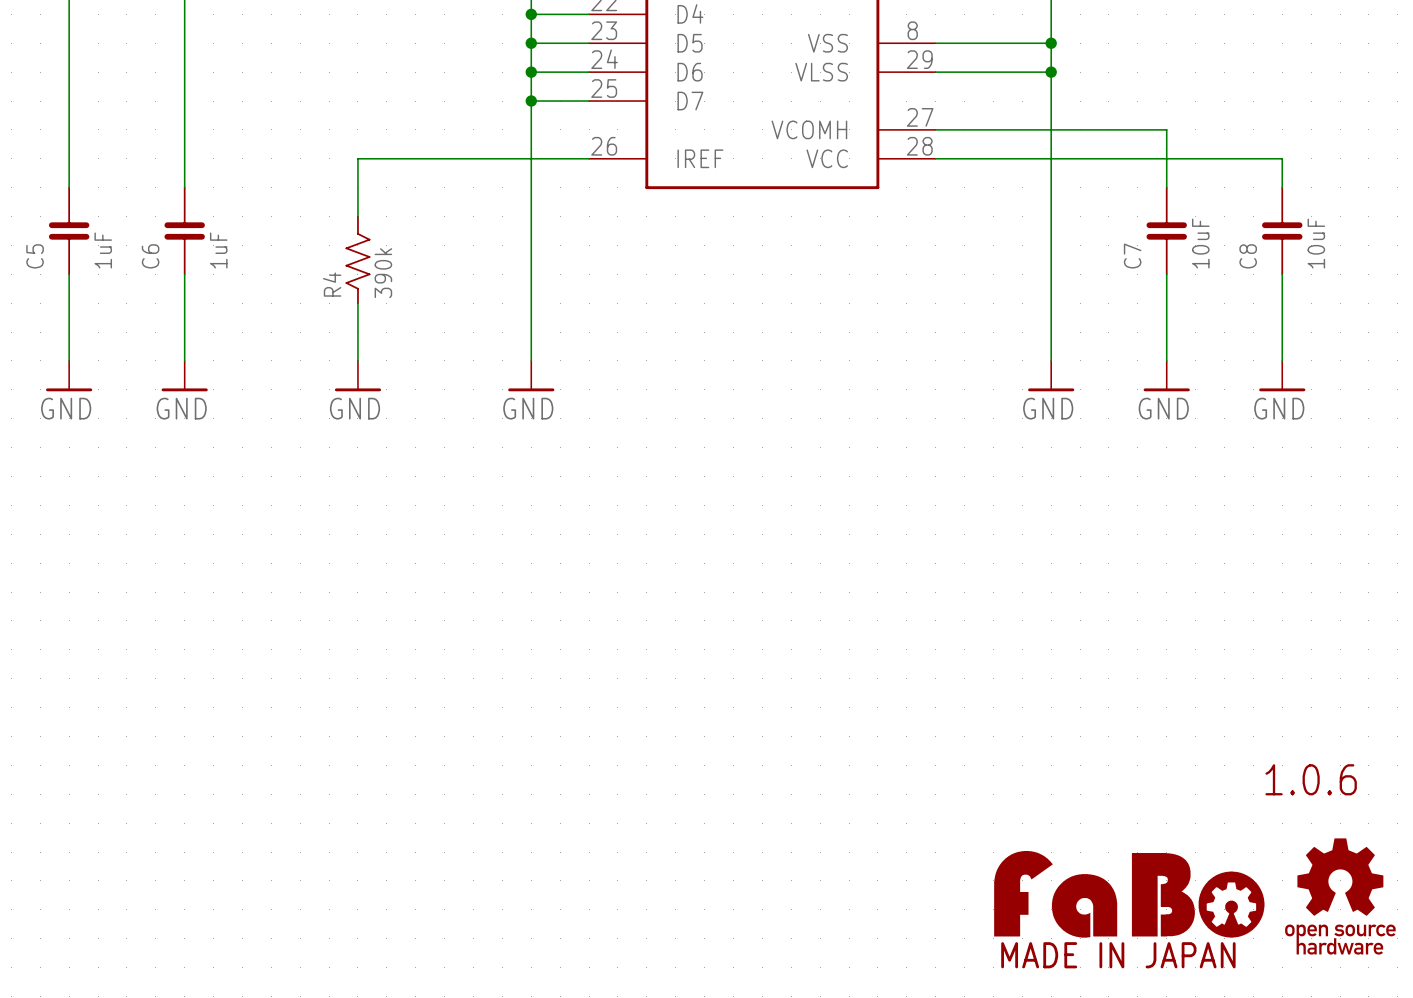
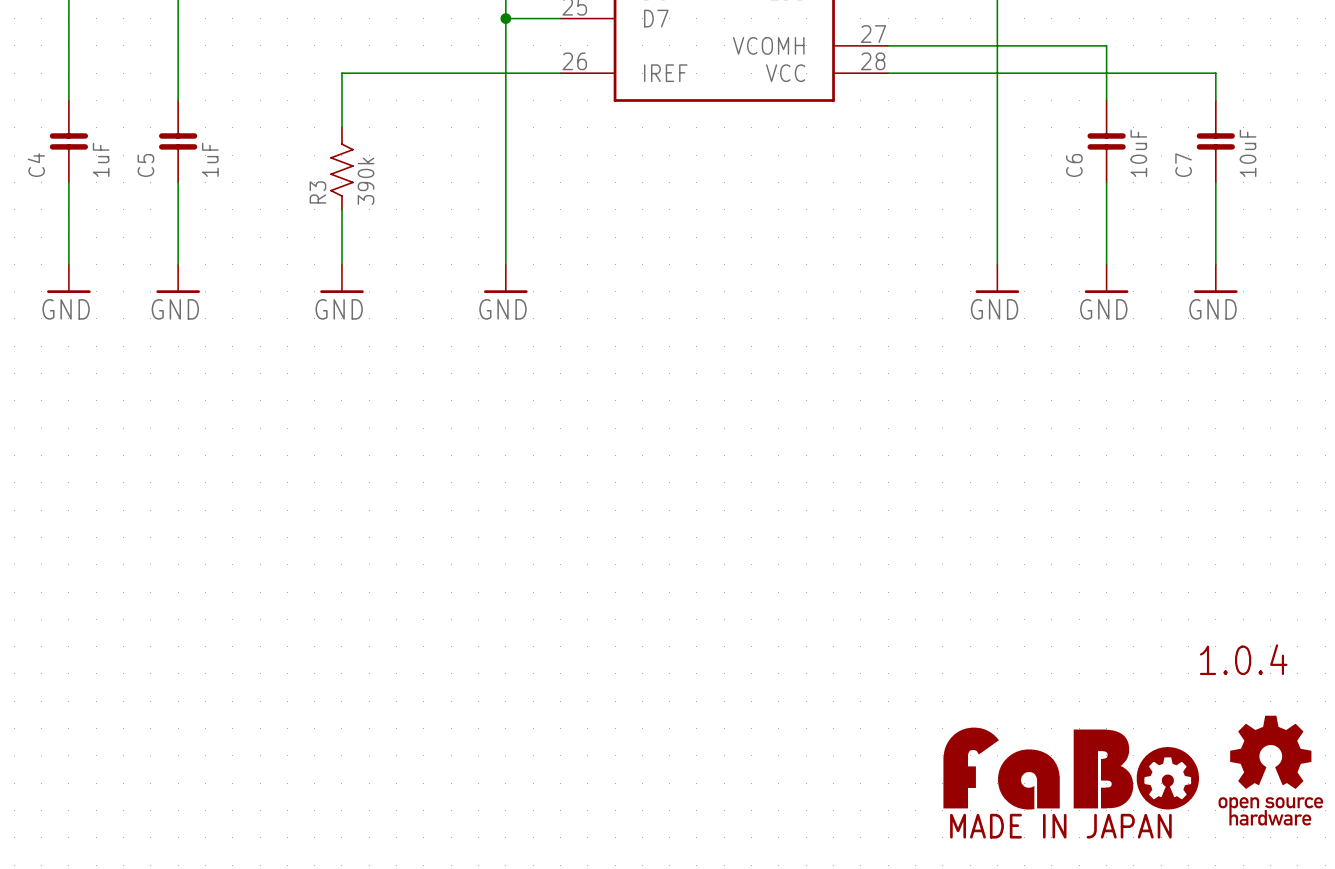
C5 name: C5 (35, 256) -> C4 (36, 165)
C6 name: C6 (150, 256) -> C5 (145, 165)
C7 name: C7 (1132, 256) -> C6 (1074, 165)
C8 name: C8 (1248, 256) -> C7 (1183, 165)
R4 name: R4 (332, 284) -> R3 (317, 192)
text: 1.0.6 (1311, 779) -> 1.0.4 (1243, 659)

